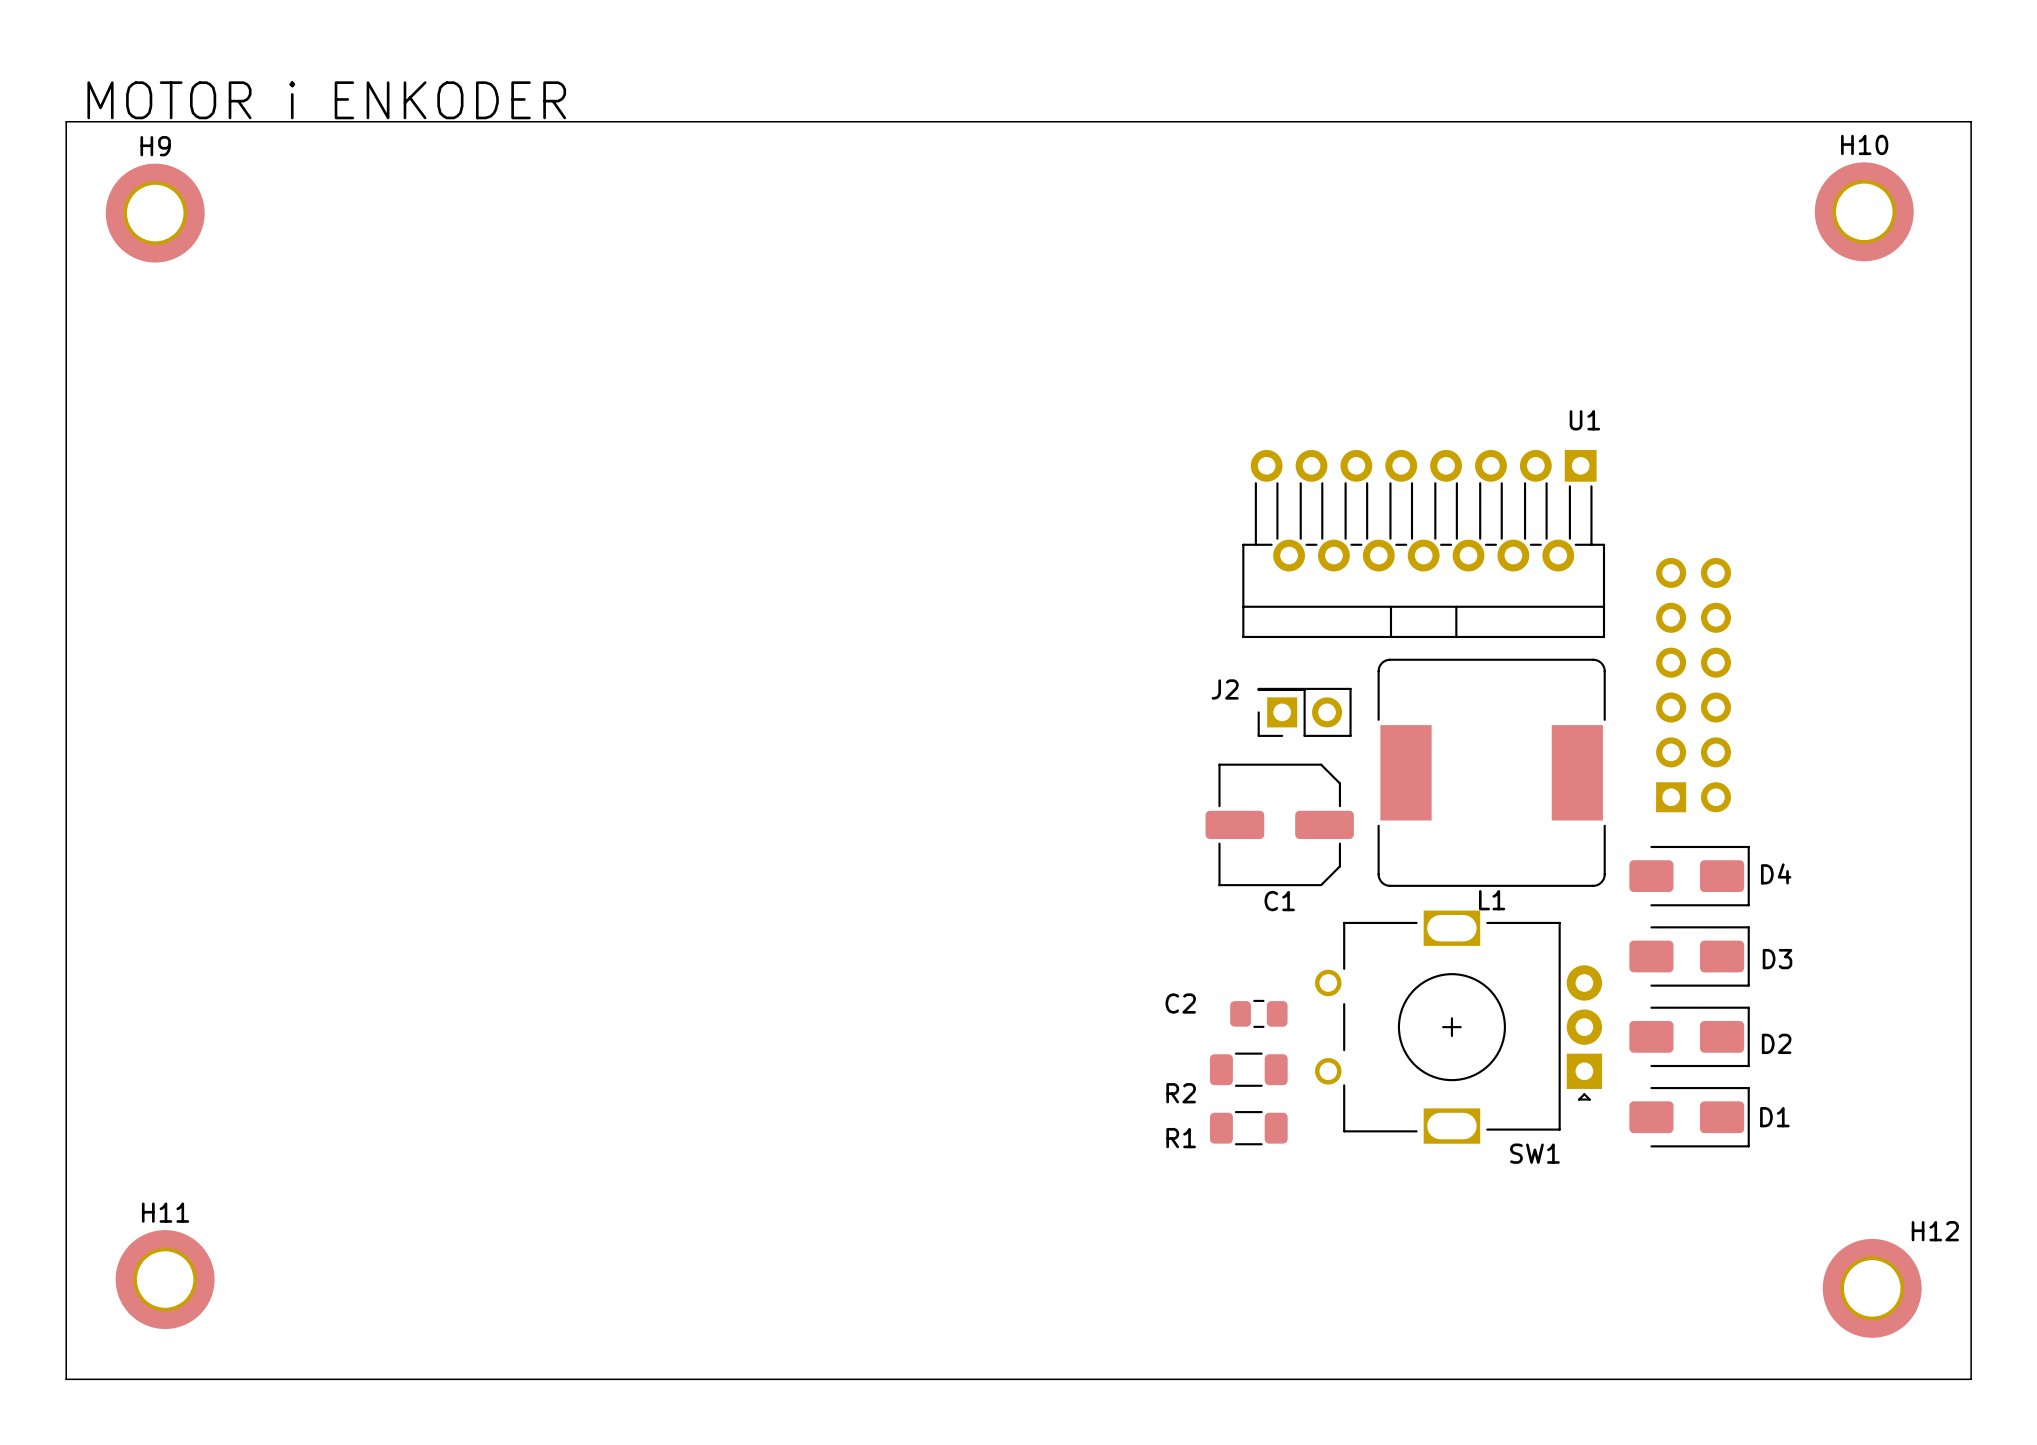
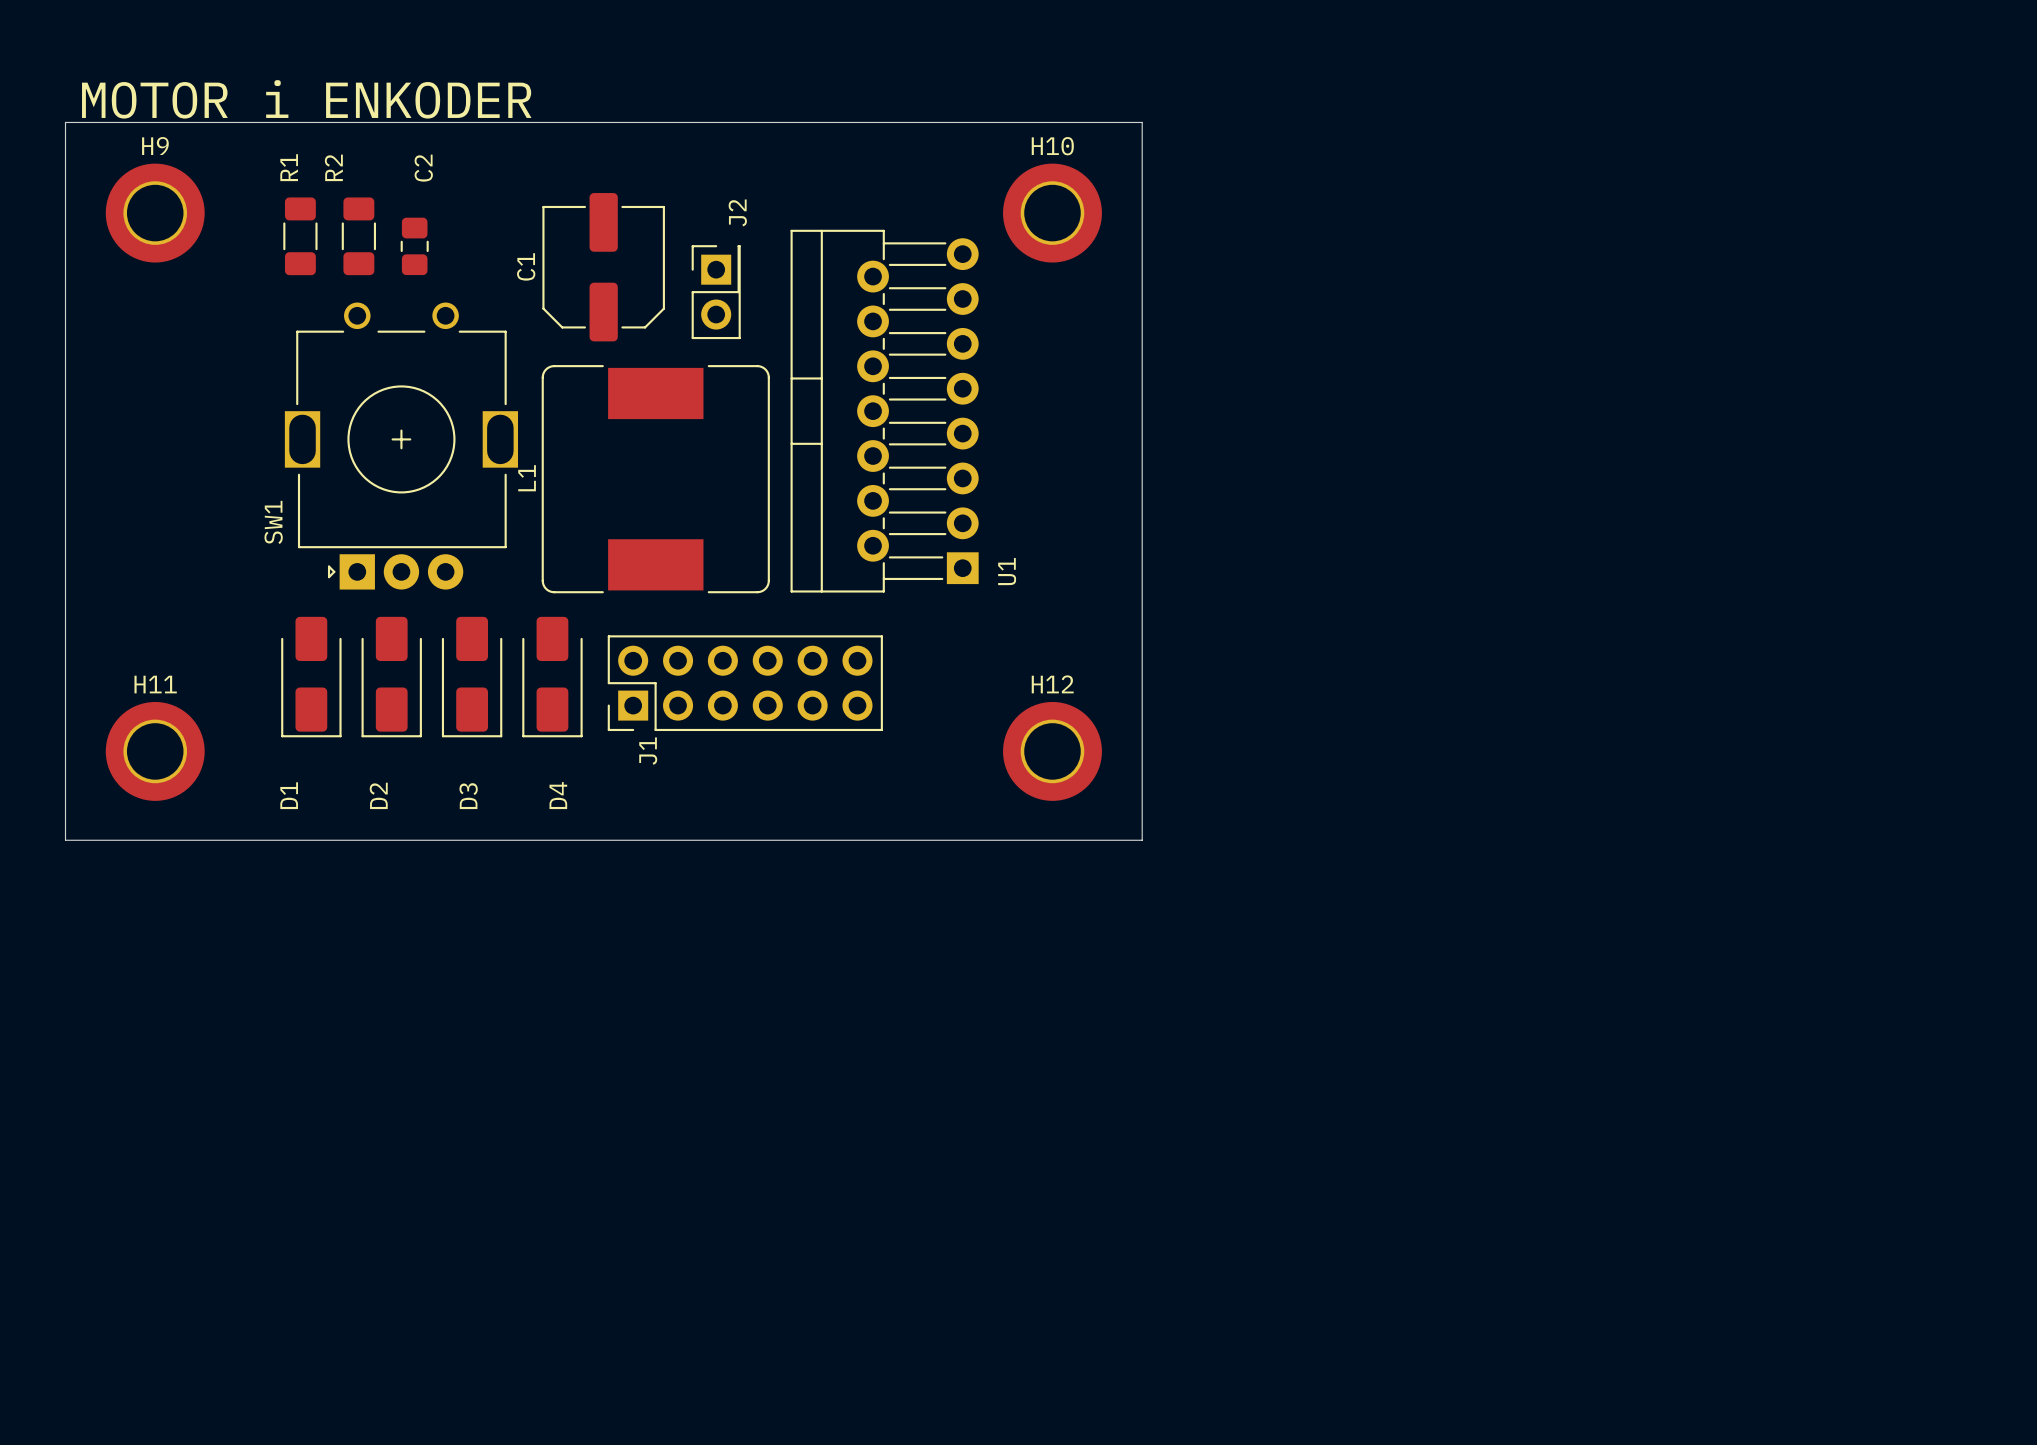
board edge: (66, 121) (1971, 121) (1971, 1379) (66, 1379) (66, 121) -> none
board edge: none -> (65, 122) (1142, 122) (1142, 840) (65, 840) (65, 122)
H10 position: (1864, 211) -> (1052, 213)
U1 rotation: 0° (1423, 543) -> 90° clockwise (884, 411)
U1 position: (1423, 543) -> (884, 411)
J1: none -> (745, 683)
part: (1693, 685) -> none
J2 rotation: 0° (1304, 712) -> 90° clockwise (716, 292)
J2 position: (1304, 712) -> (716, 292)
L1 rotation: 0° (1491, 772) -> 90° clockwise (655, 479)
L1 position: (1491, 772) -> (655, 479)
C1 rotation: 0° (1279, 824) -> 90° clockwise (603, 267)
C1 position: (1279, 824) -> (603, 267)
D4 rotation: 0° (1689, 876) -> 90° clockwise (552, 677)
D4 position: (1689, 876) -> (552, 677)
D3 rotation: 0° (1689, 956) -> 90° clockwise (472, 677)
D3 position: (1689, 956) -> (472, 677)
C2 rotation: 0° (1258, 1013) -> 90° clockwise (414, 246)
C2 position: (1258, 1013) -> (414, 246)
SW1 rotation: 0° (1458, 1027) -> 90° clockwise (401, 446)
SW1 position: (1458, 1027) -> (401, 446)
D2 rotation: 0° (1689, 1036) -> 90° clockwise (391, 677)
D2 position: (1689, 1036) -> (391, 677)
R2 rotation: 0° (1248, 1069) -> 90° clockwise (358, 236)
R2 position: (1248, 1069) -> (358, 236)
D1 rotation: 0° (1689, 1117) -> 90° clockwise (311, 677)
D1 position: (1689, 1117) -> (311, 677)
D1 name position: D1 (1774, 1117) -> D1 (289, 795)
R1 rotation: 0° (1248, 1128) -> 90° clockwise (300, 236)
R1 position: (1248, 1128) -> (300, 236)
H12 name position: H12 (1935, 1231) -> H12 (1052, 684)
H11 position: (165, 1279) -> (155, 751)
H12 position: (1872, 1288) -> (1052, 751)

